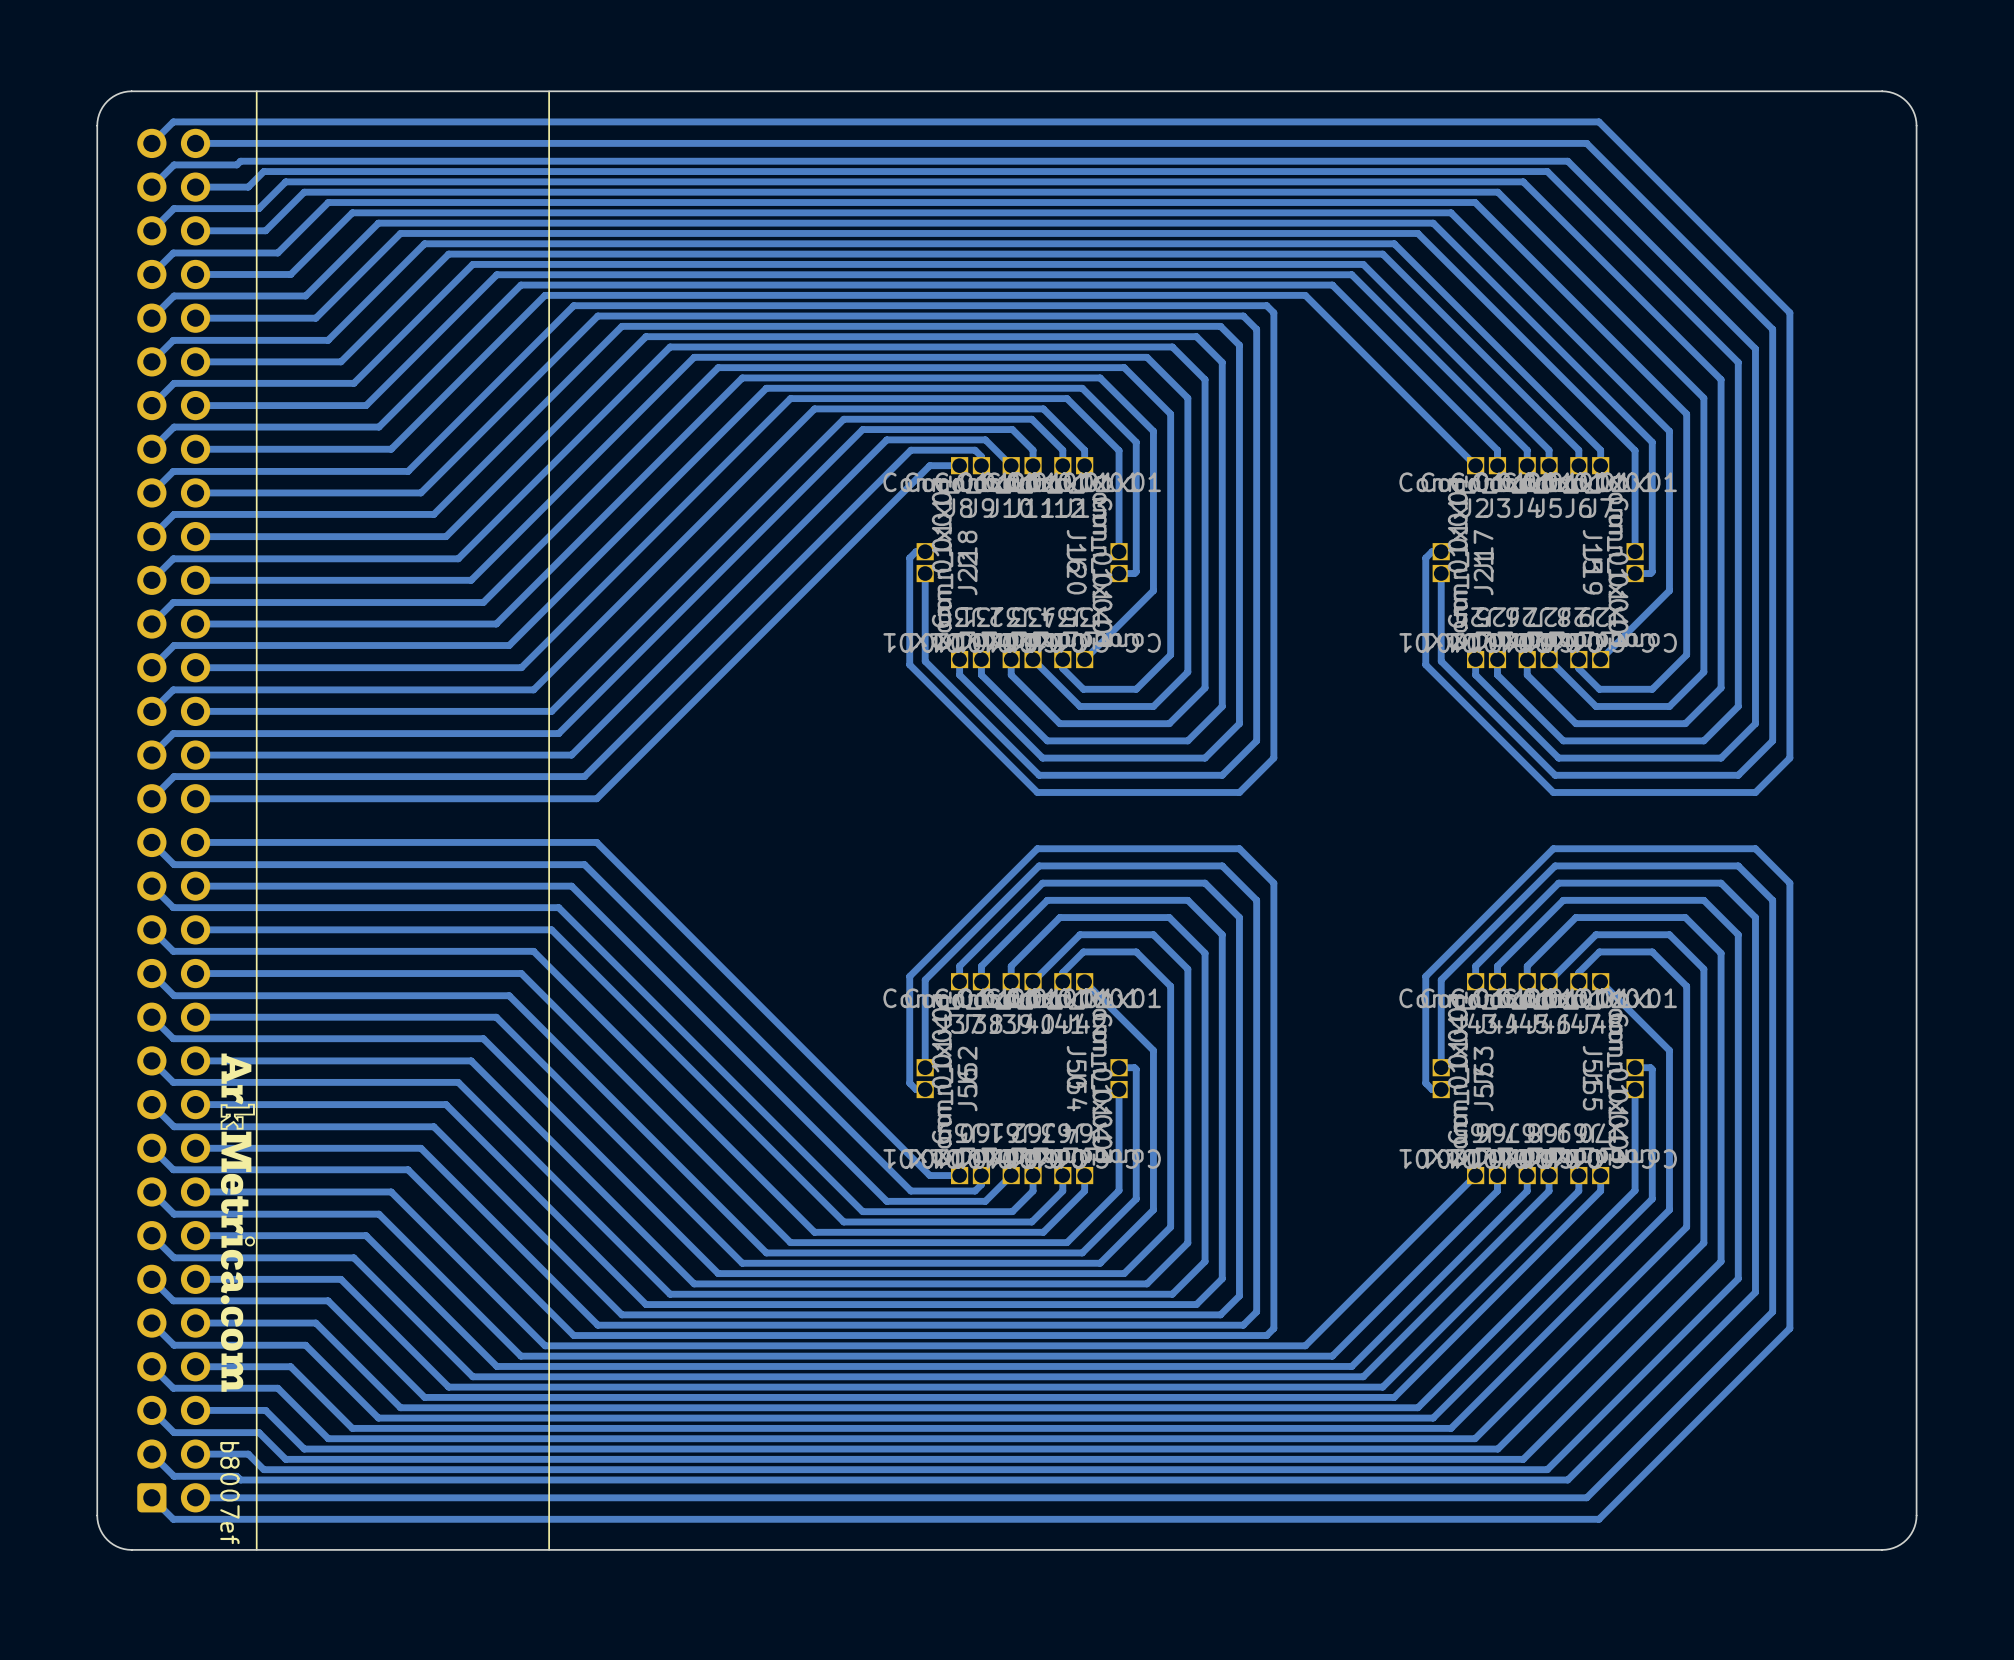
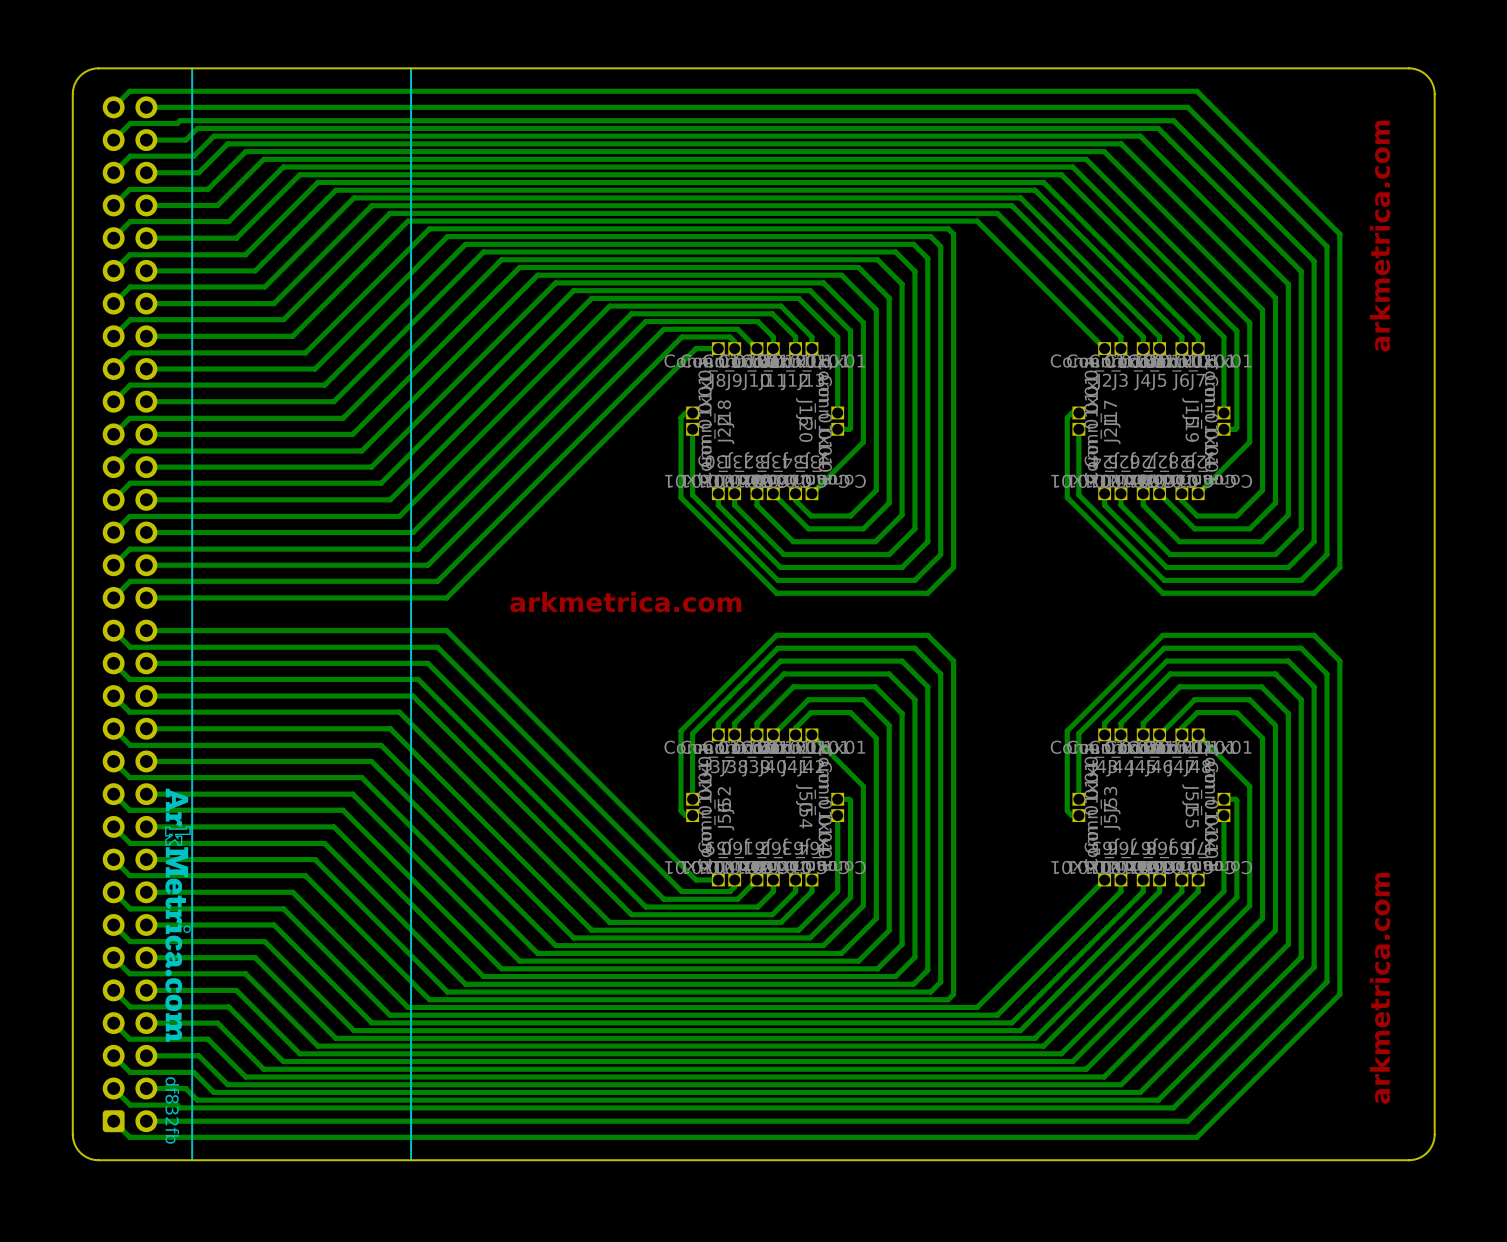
text: none -> arkmetrica.com (1379, 236)
text: none -> arkmetrica.com (625, 602)
text: none -> arkmetrica.com (1379, 988)
text: b8007ef (229, 1493) -> df832fb (172, 1110)

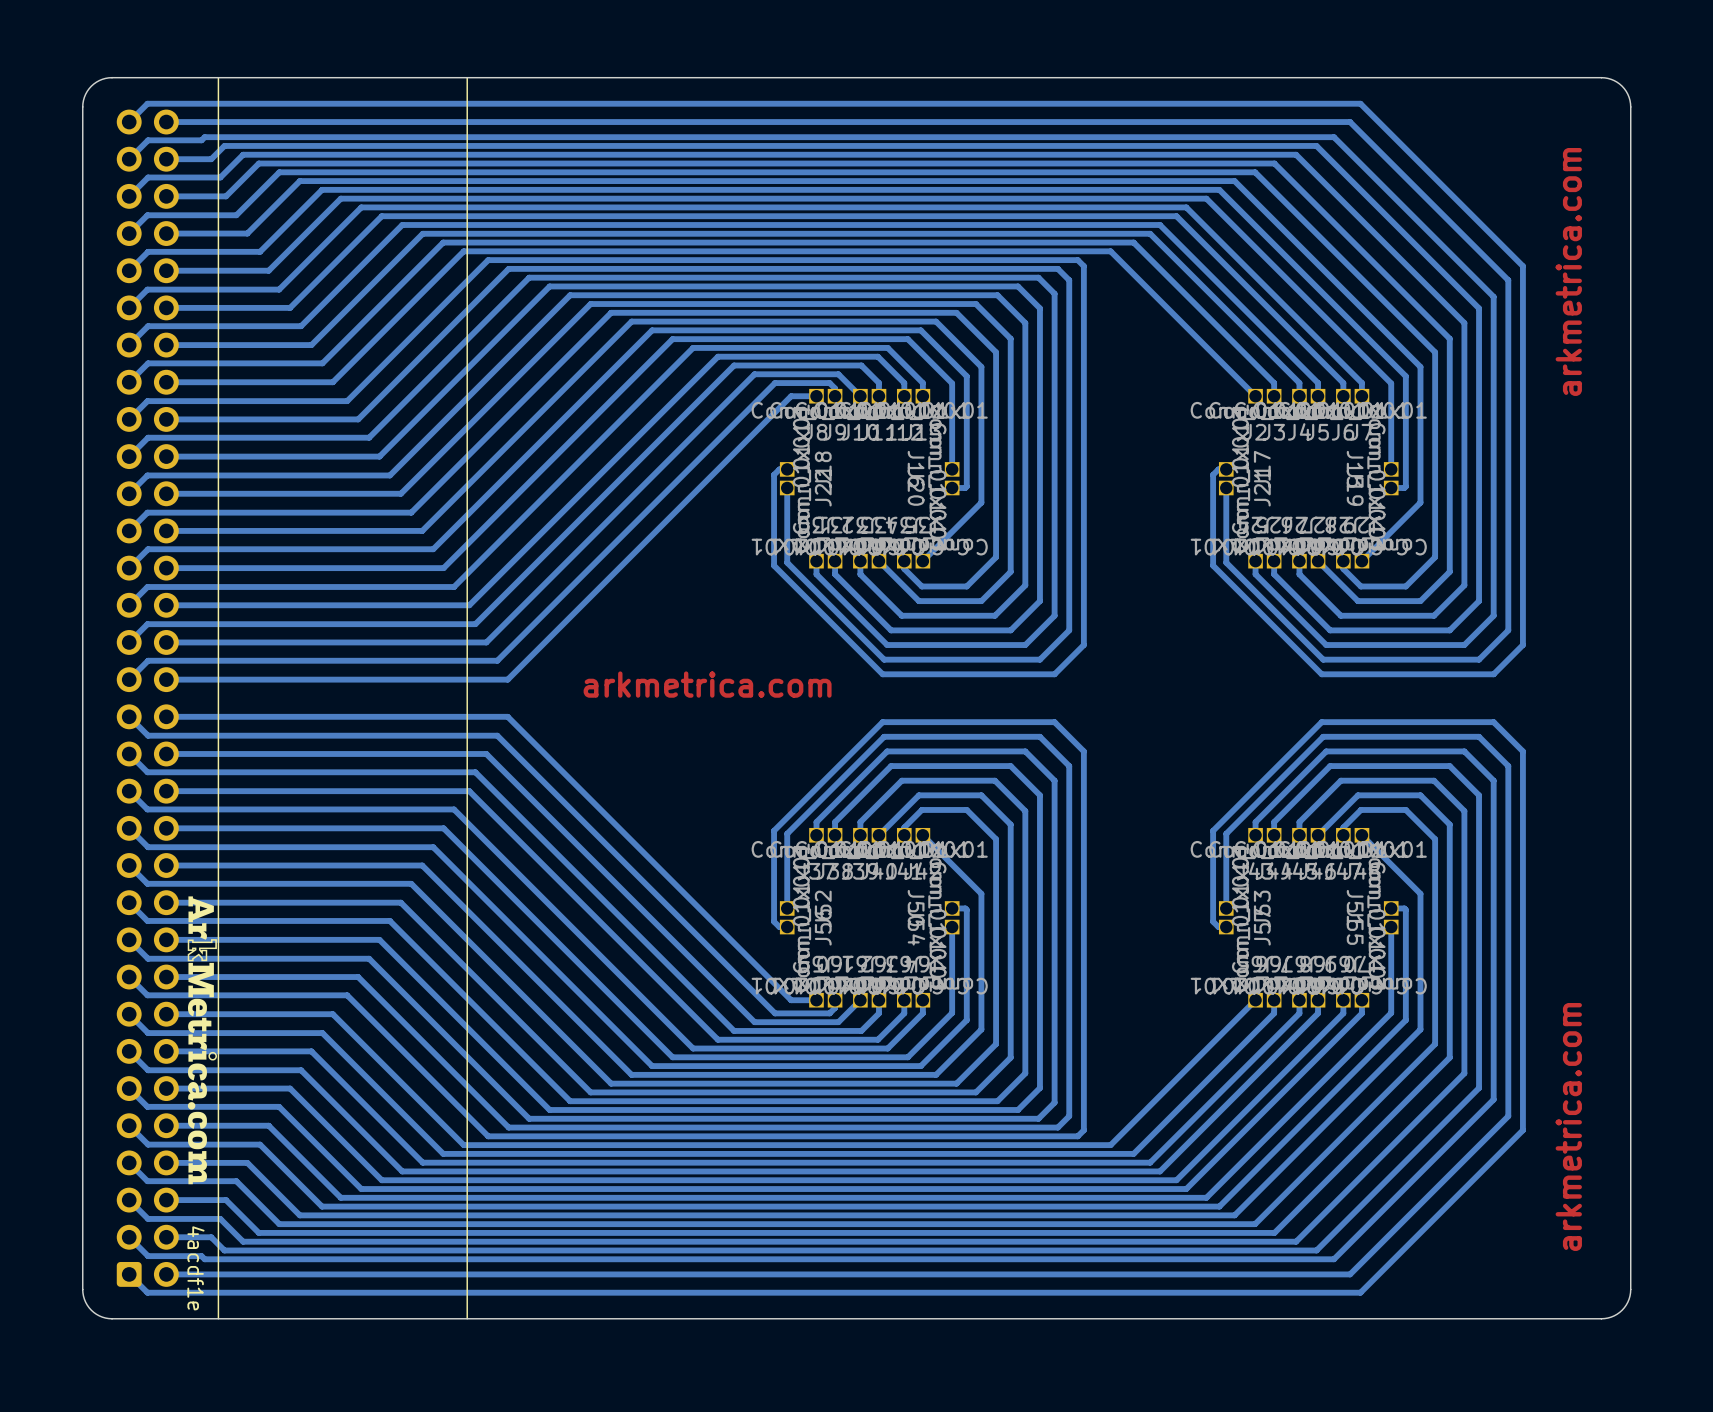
text: df832fb (172, 1110) -> 4acdf1e (195, 1268)

